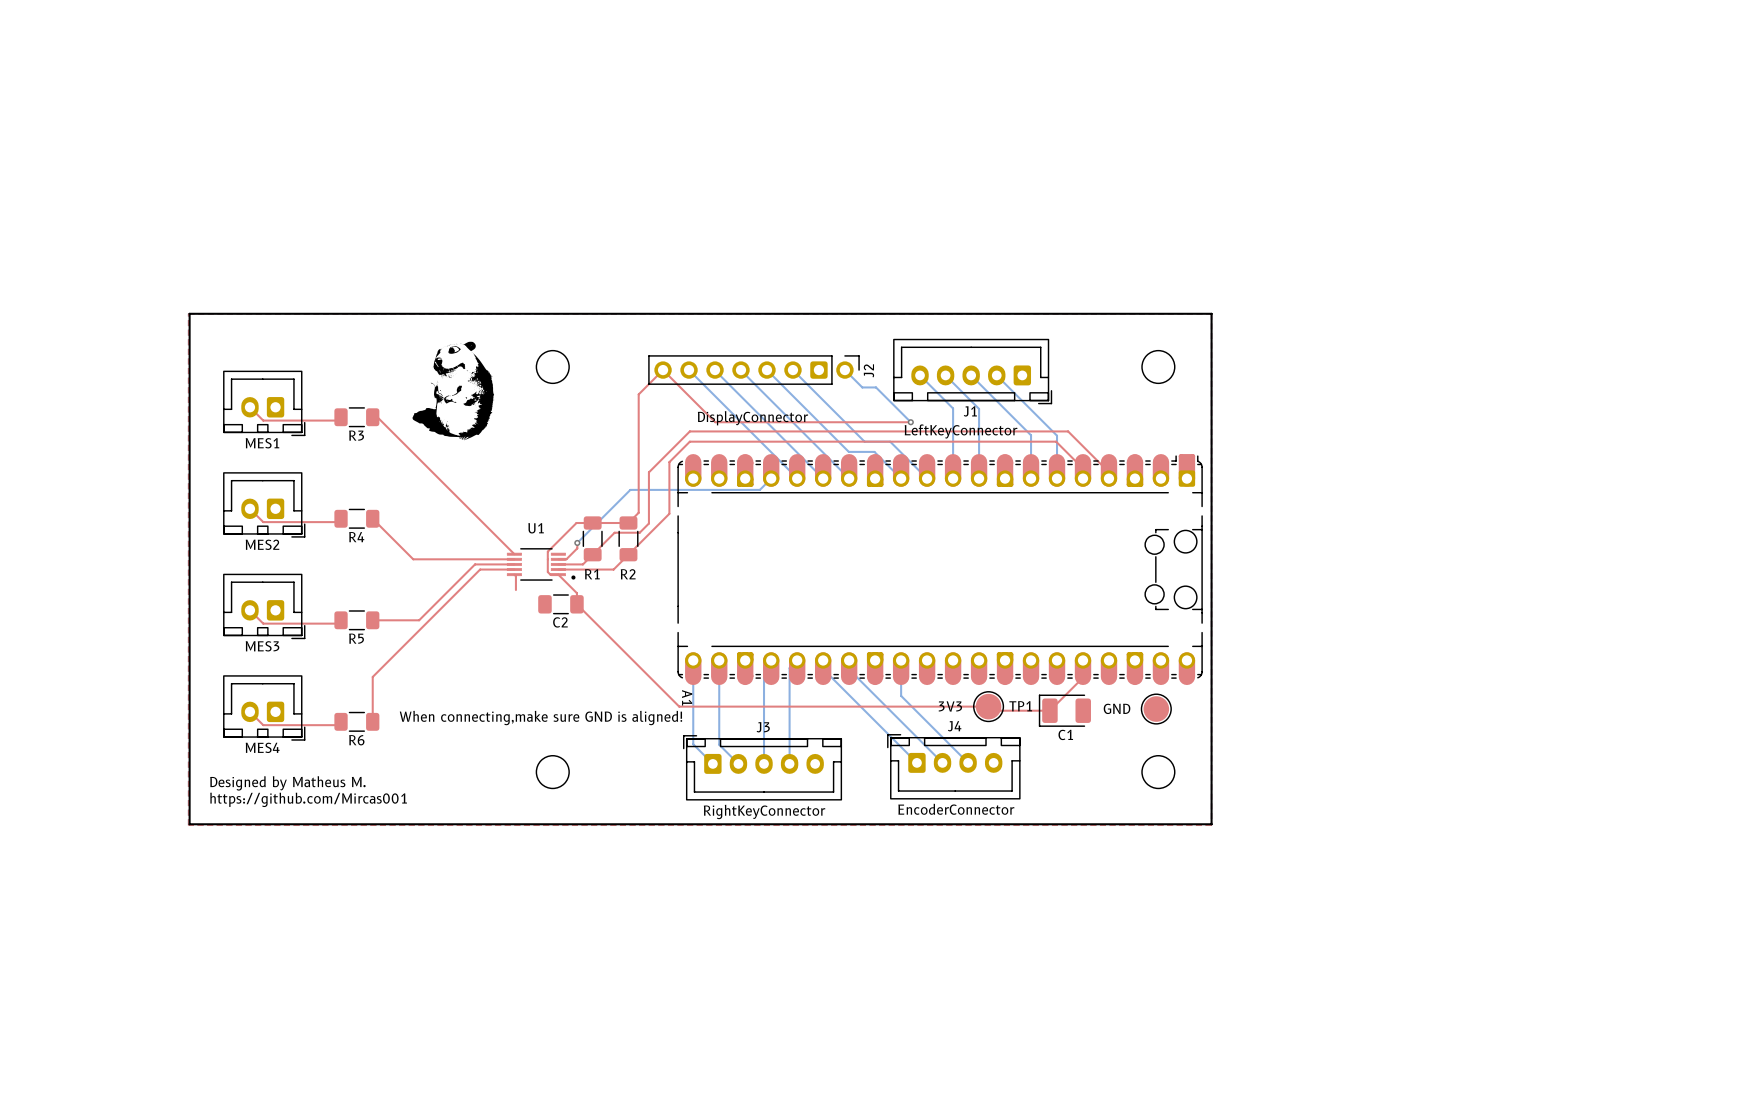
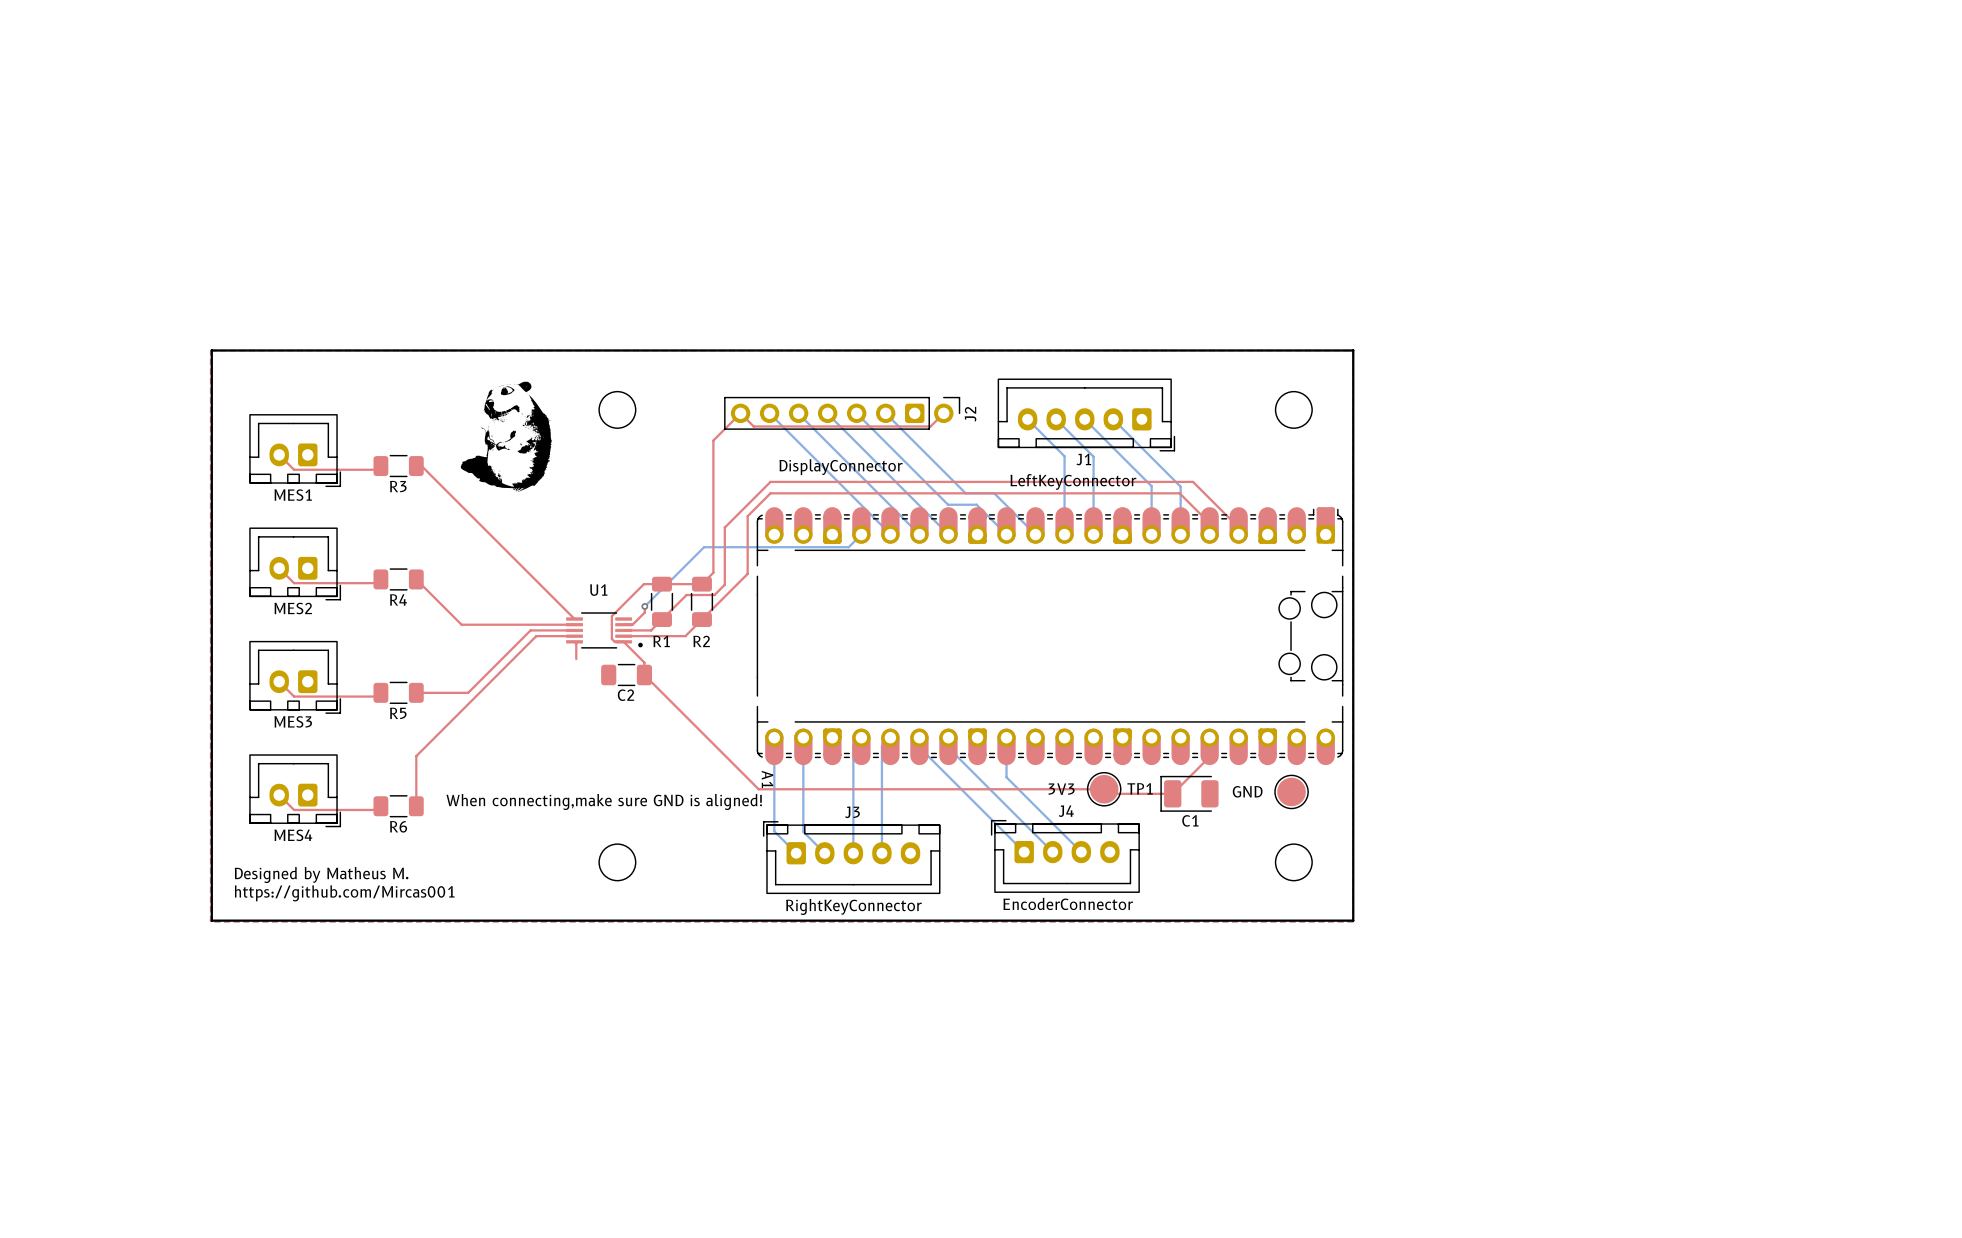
bottom track: (844, 370) (862, 387) (876, 387) (910, 422) -> none
top track: (674, 381) (715, 422) (910, 422) -> (753, 426) (930, 426) (943, 413)
via: (910, 422) -> none

